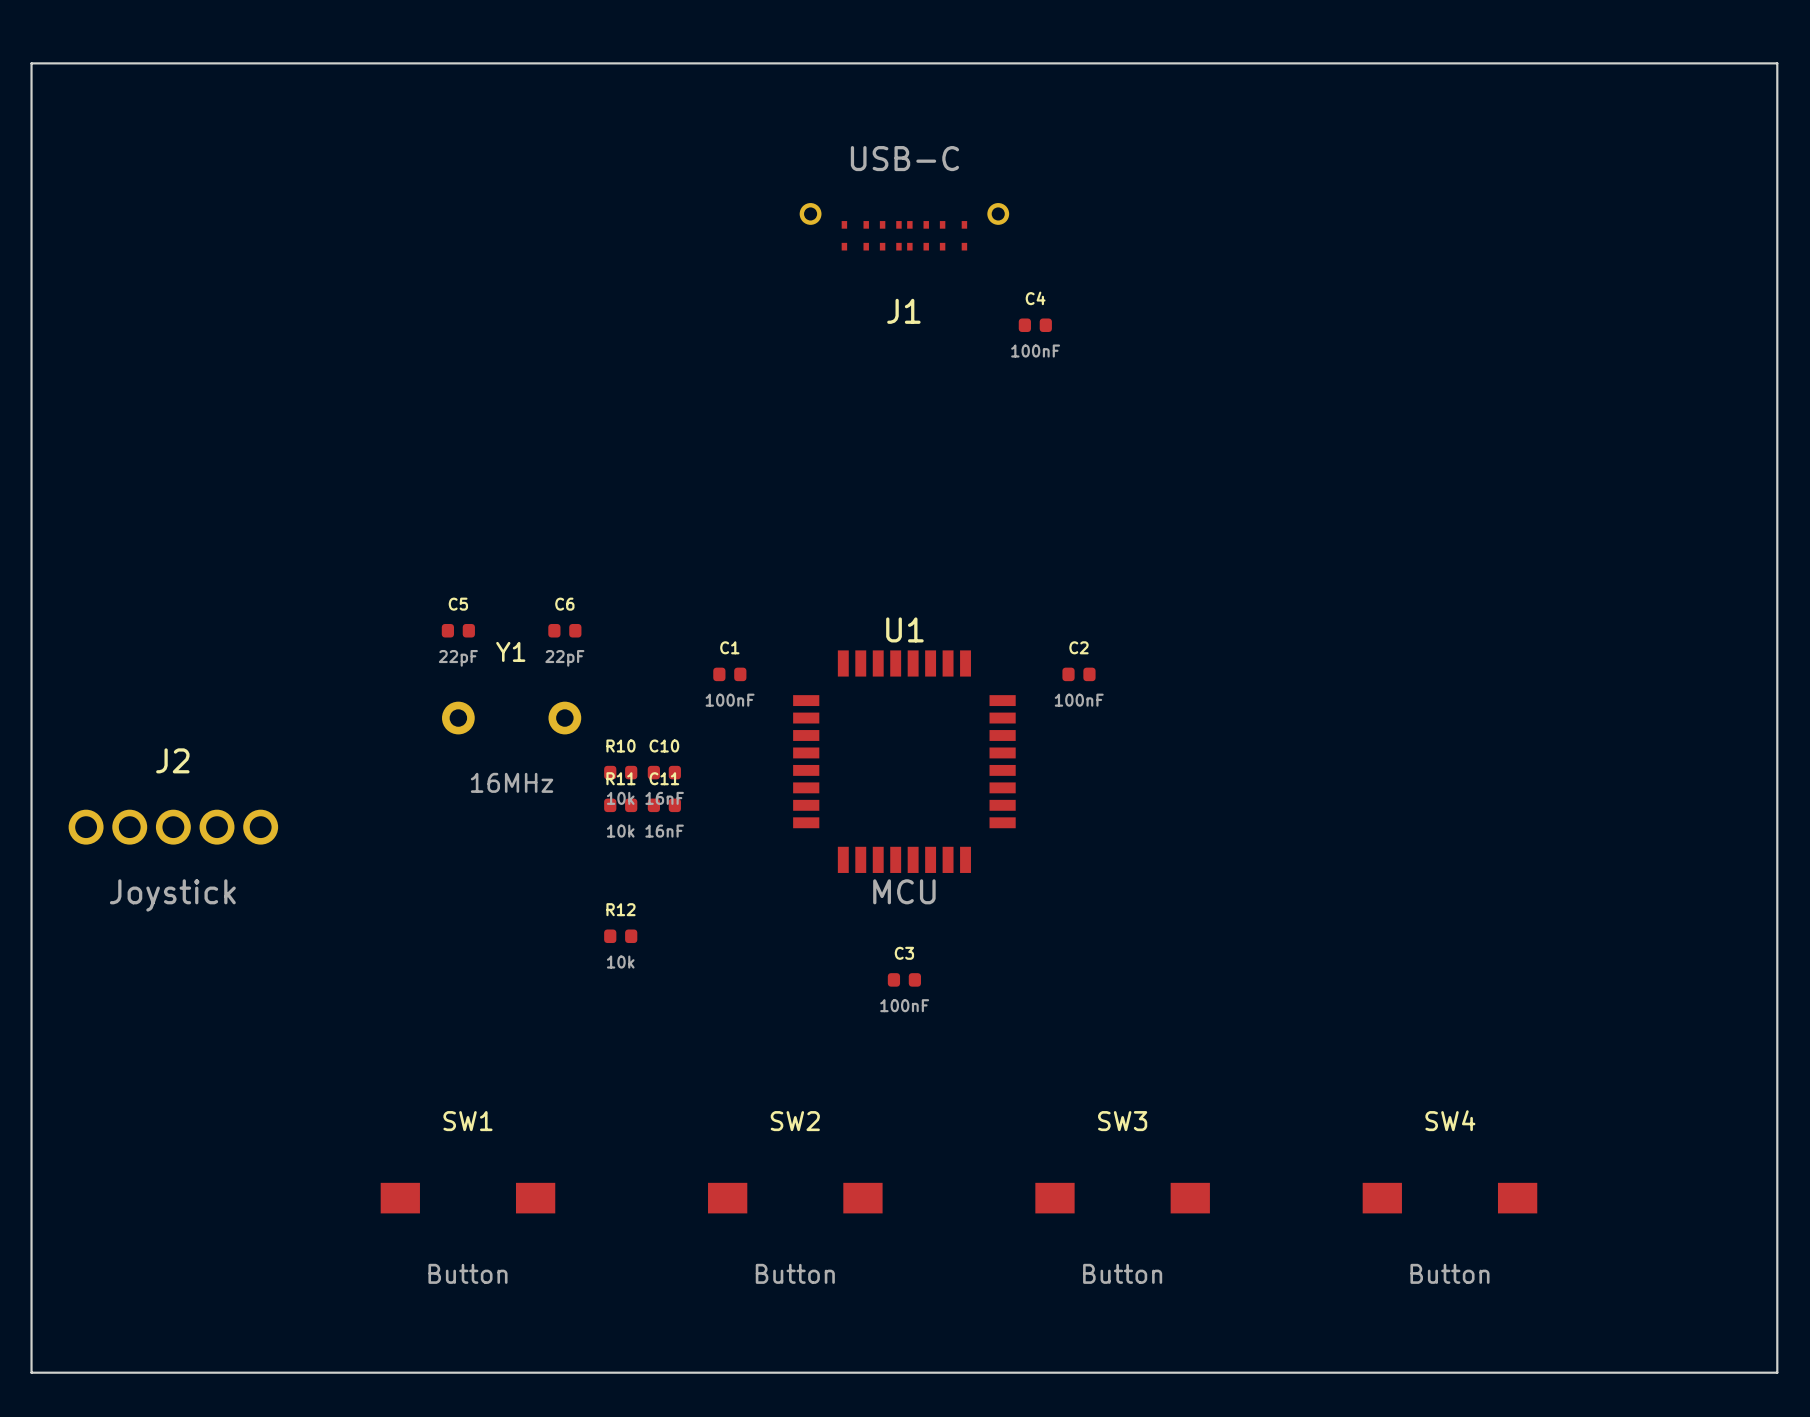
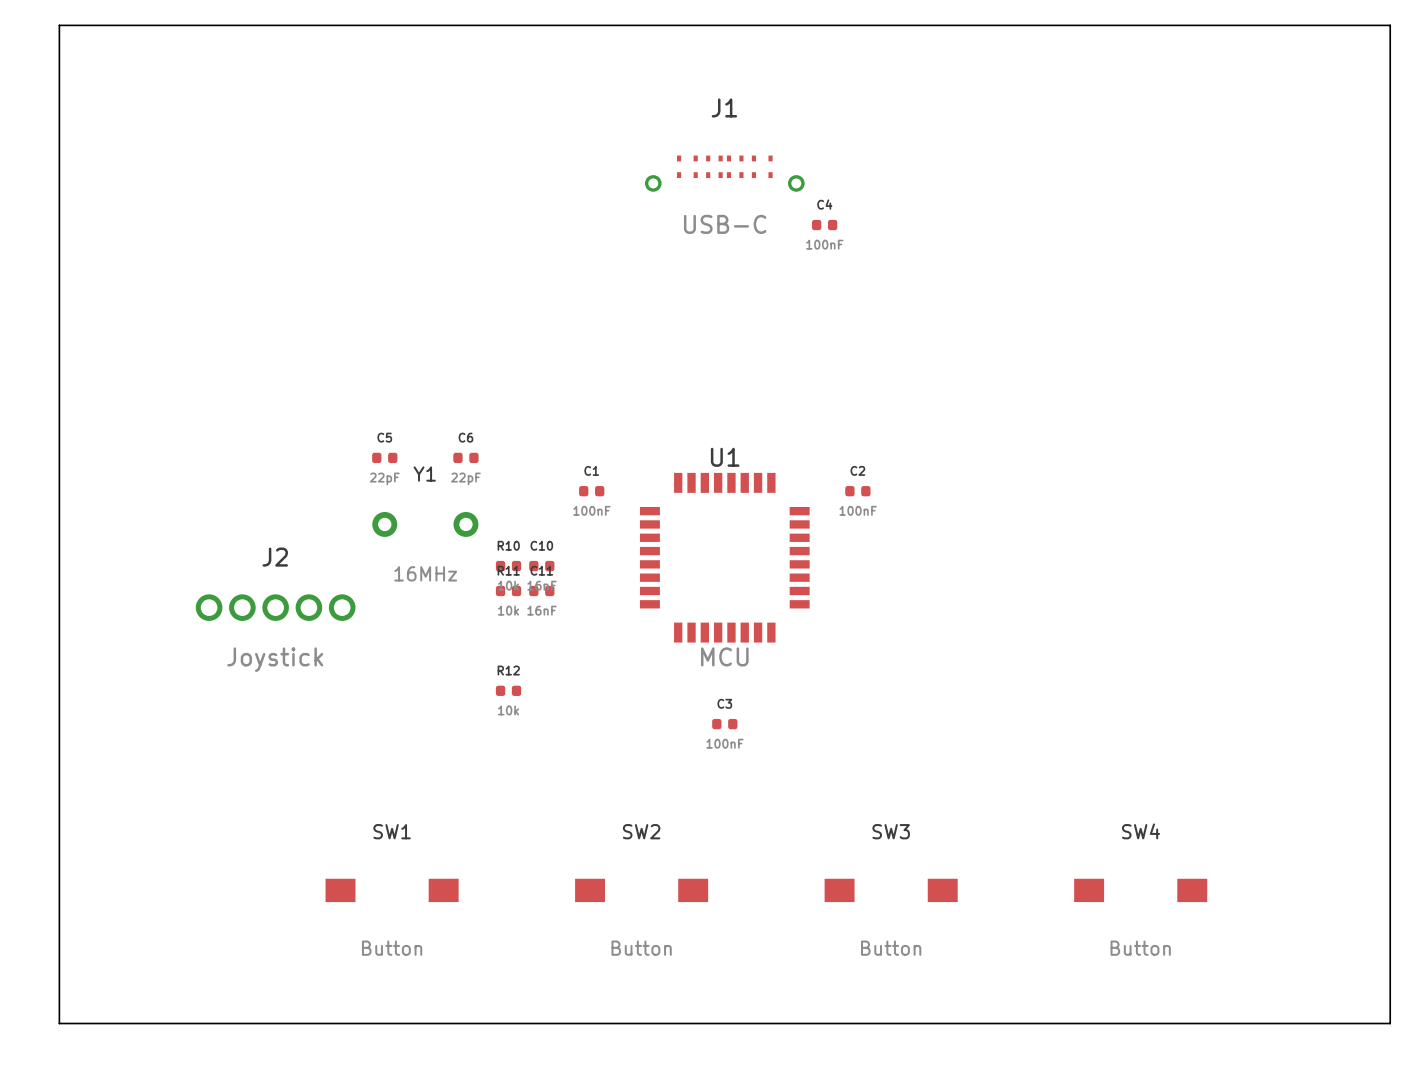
J1 rotation: 0° (904, 226) -> 180° (724, 173)
J2 position: (173, 827) -> (275, 607)

